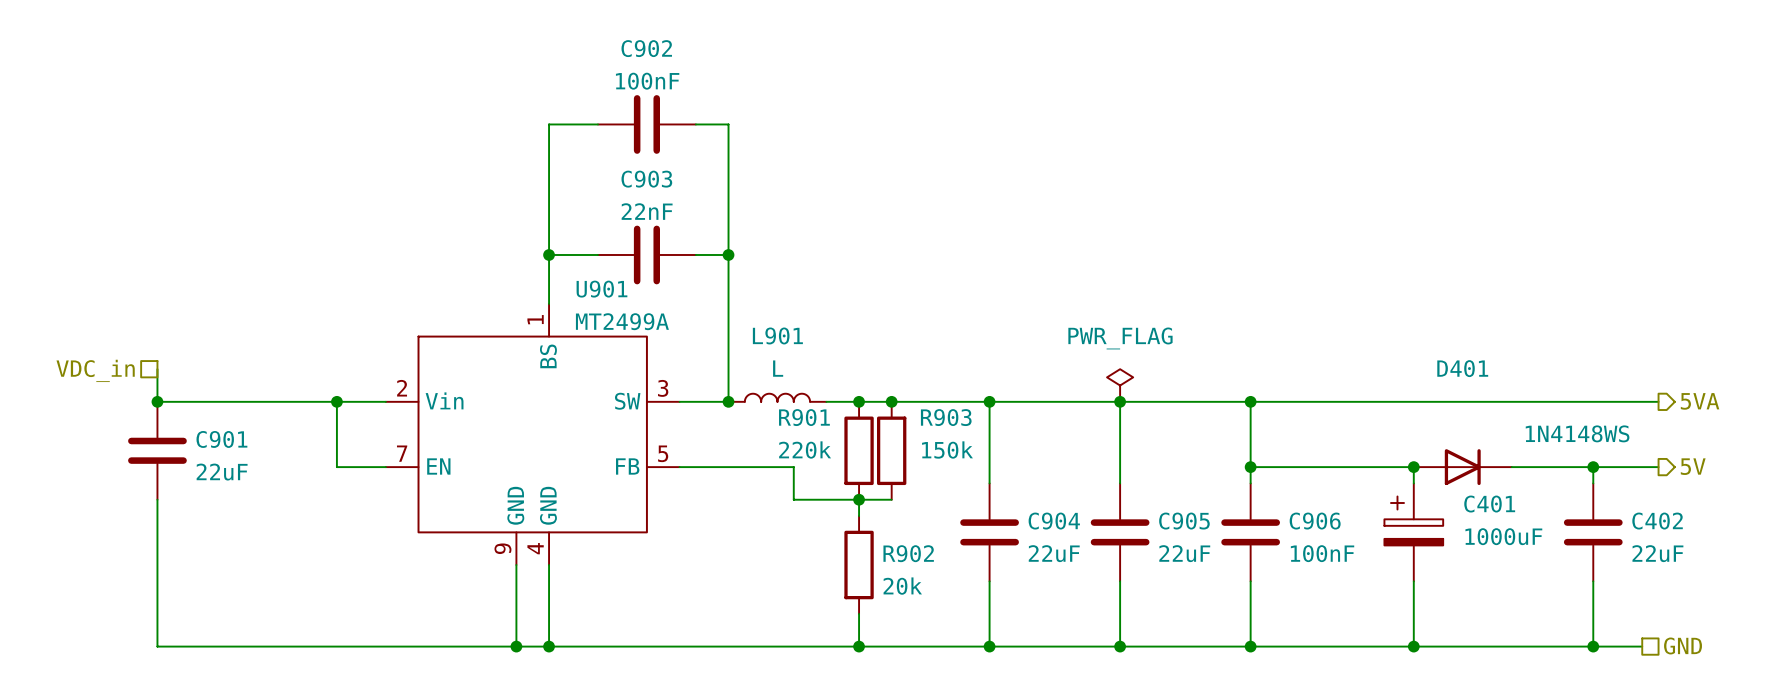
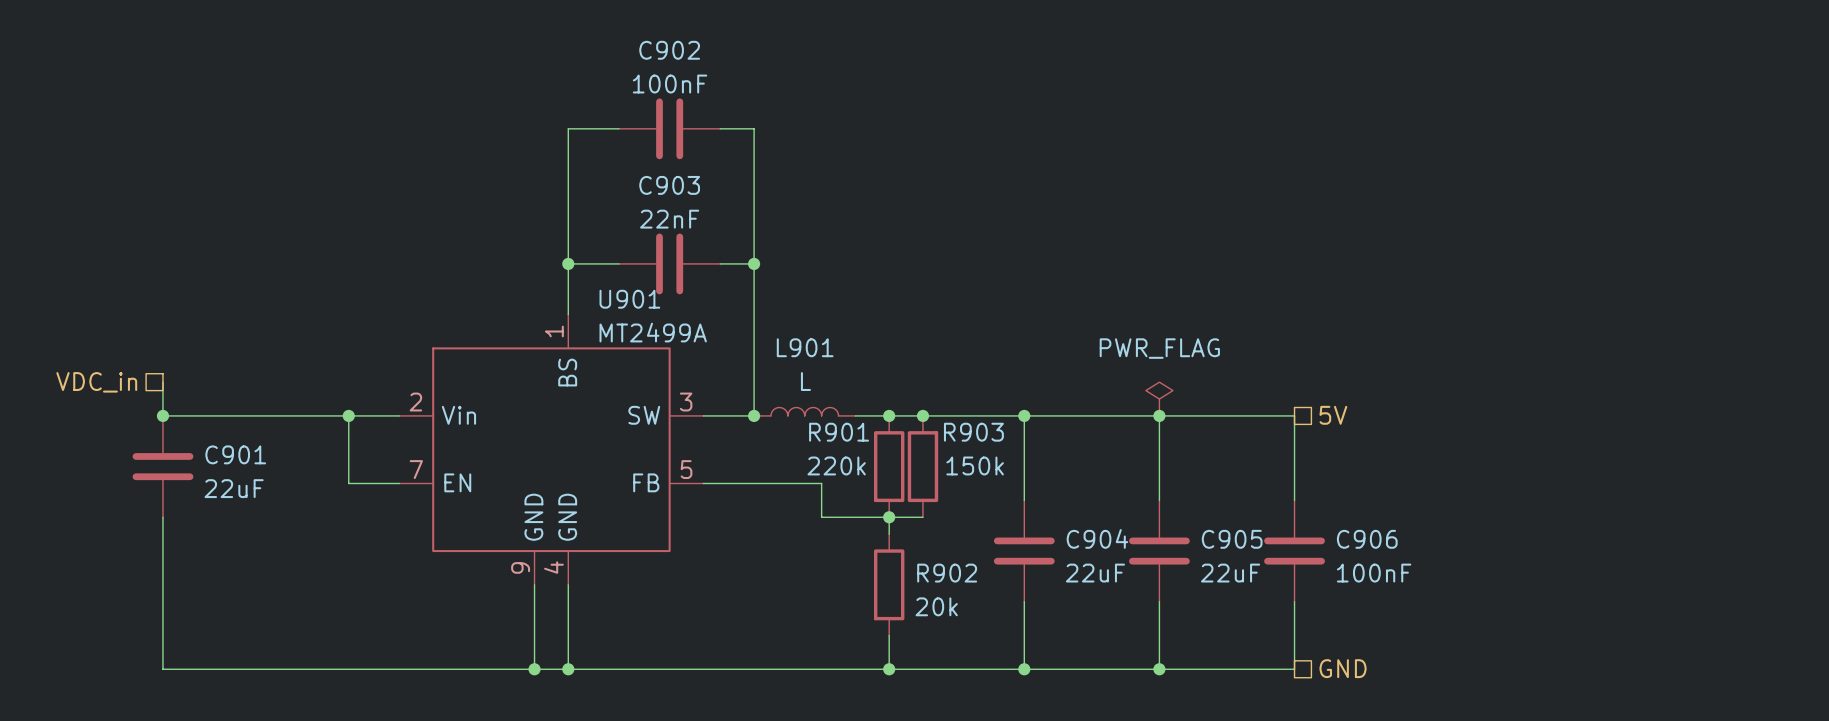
wire: (1250, 401) (1658, 401) -> none
junction: (1250, 401) -> none
hierarchical label: none -> 5V (1333, 415)
hierarchical label: 5VA (1700, 401) -> none
hierarchical label: 5V (1693, 466) -> none
wire: (1250, 467) (1413, 467) (1413, 483) -> none
junction: (1250, 467) -> none
junction: (1413, 467) -> none
D401: 1N4148WS (1462, 467) -> none
wire: (1511, 467) (1658, 467) -> none
wire: (1593, 467) (1593, 483) -> none
junction: (1593, 467) -> none
C401: 1000uF (1413, 532) -> none
C402: 22uF (1593, 532) -> none
wire: (1413, 581) (1413, 646) -> none
wire: (1593, 581) (1593, 646) -> none
hierarchical label: none -> GND (1343, 668)
hierarchical label: GND (1683, 645) -> none
wire: (1250, 646) (1642, 646) -> none
junction: (1250, 646) -> none
junction: (1413, 646) -> none
junction: (1593, 646) -> none

